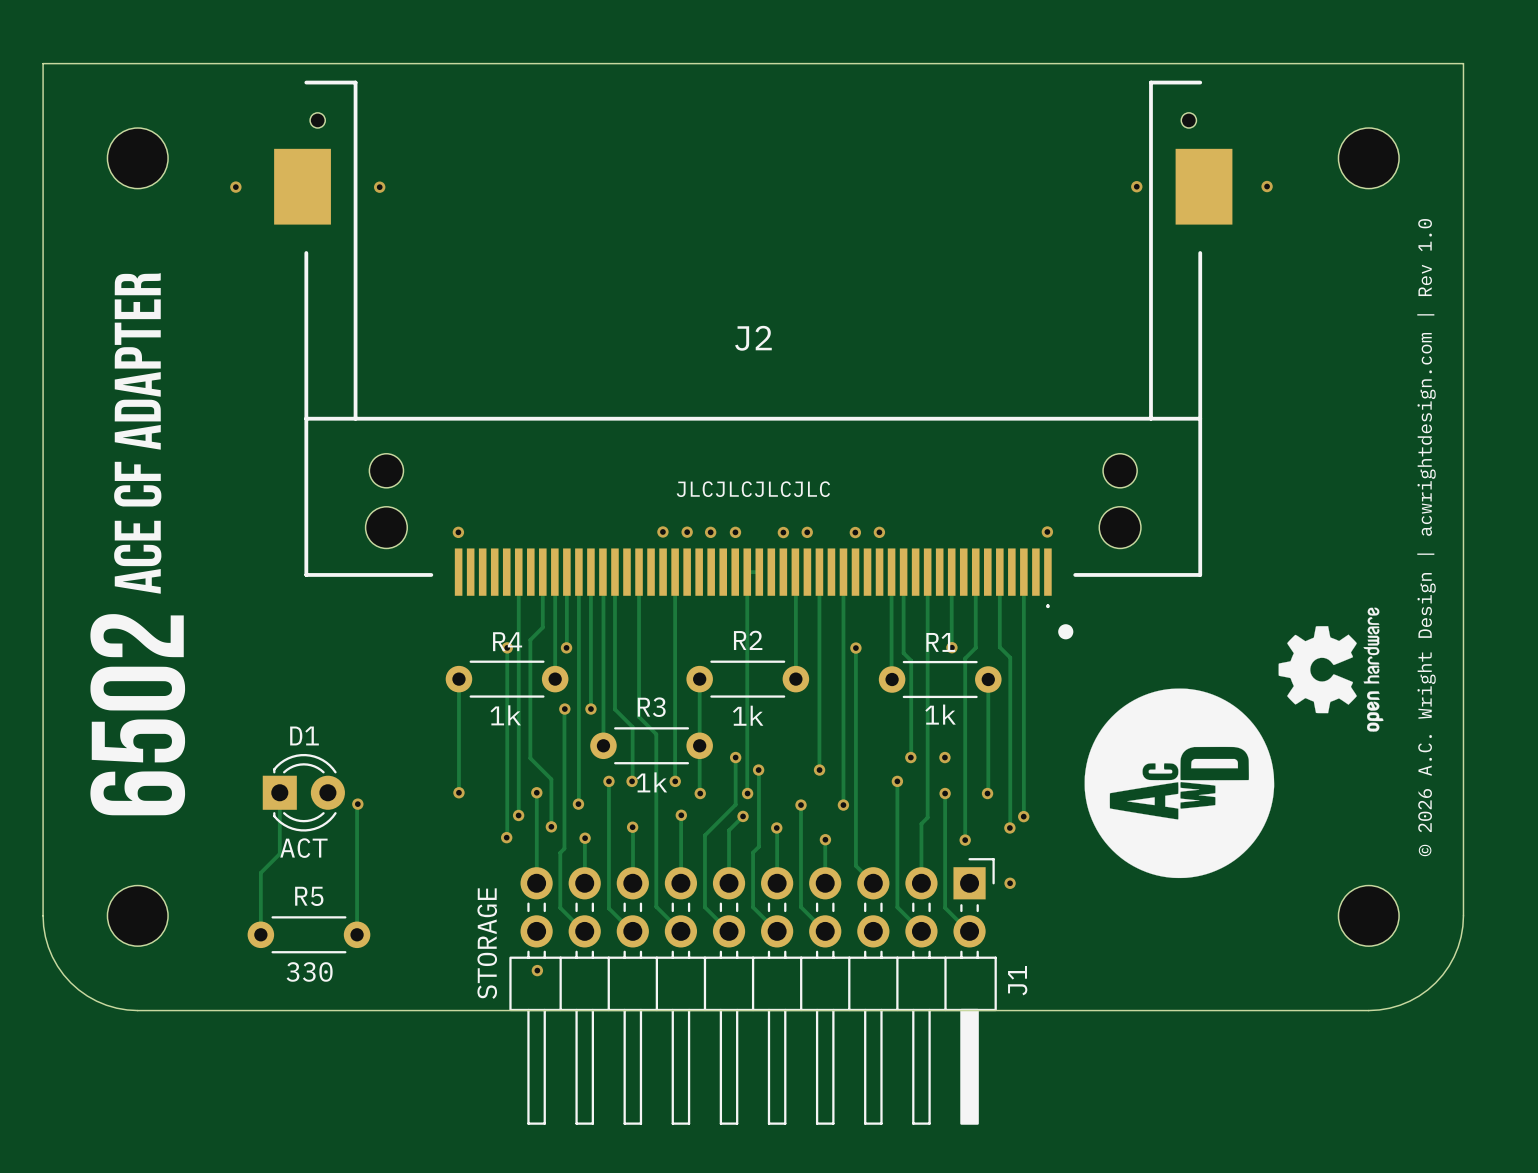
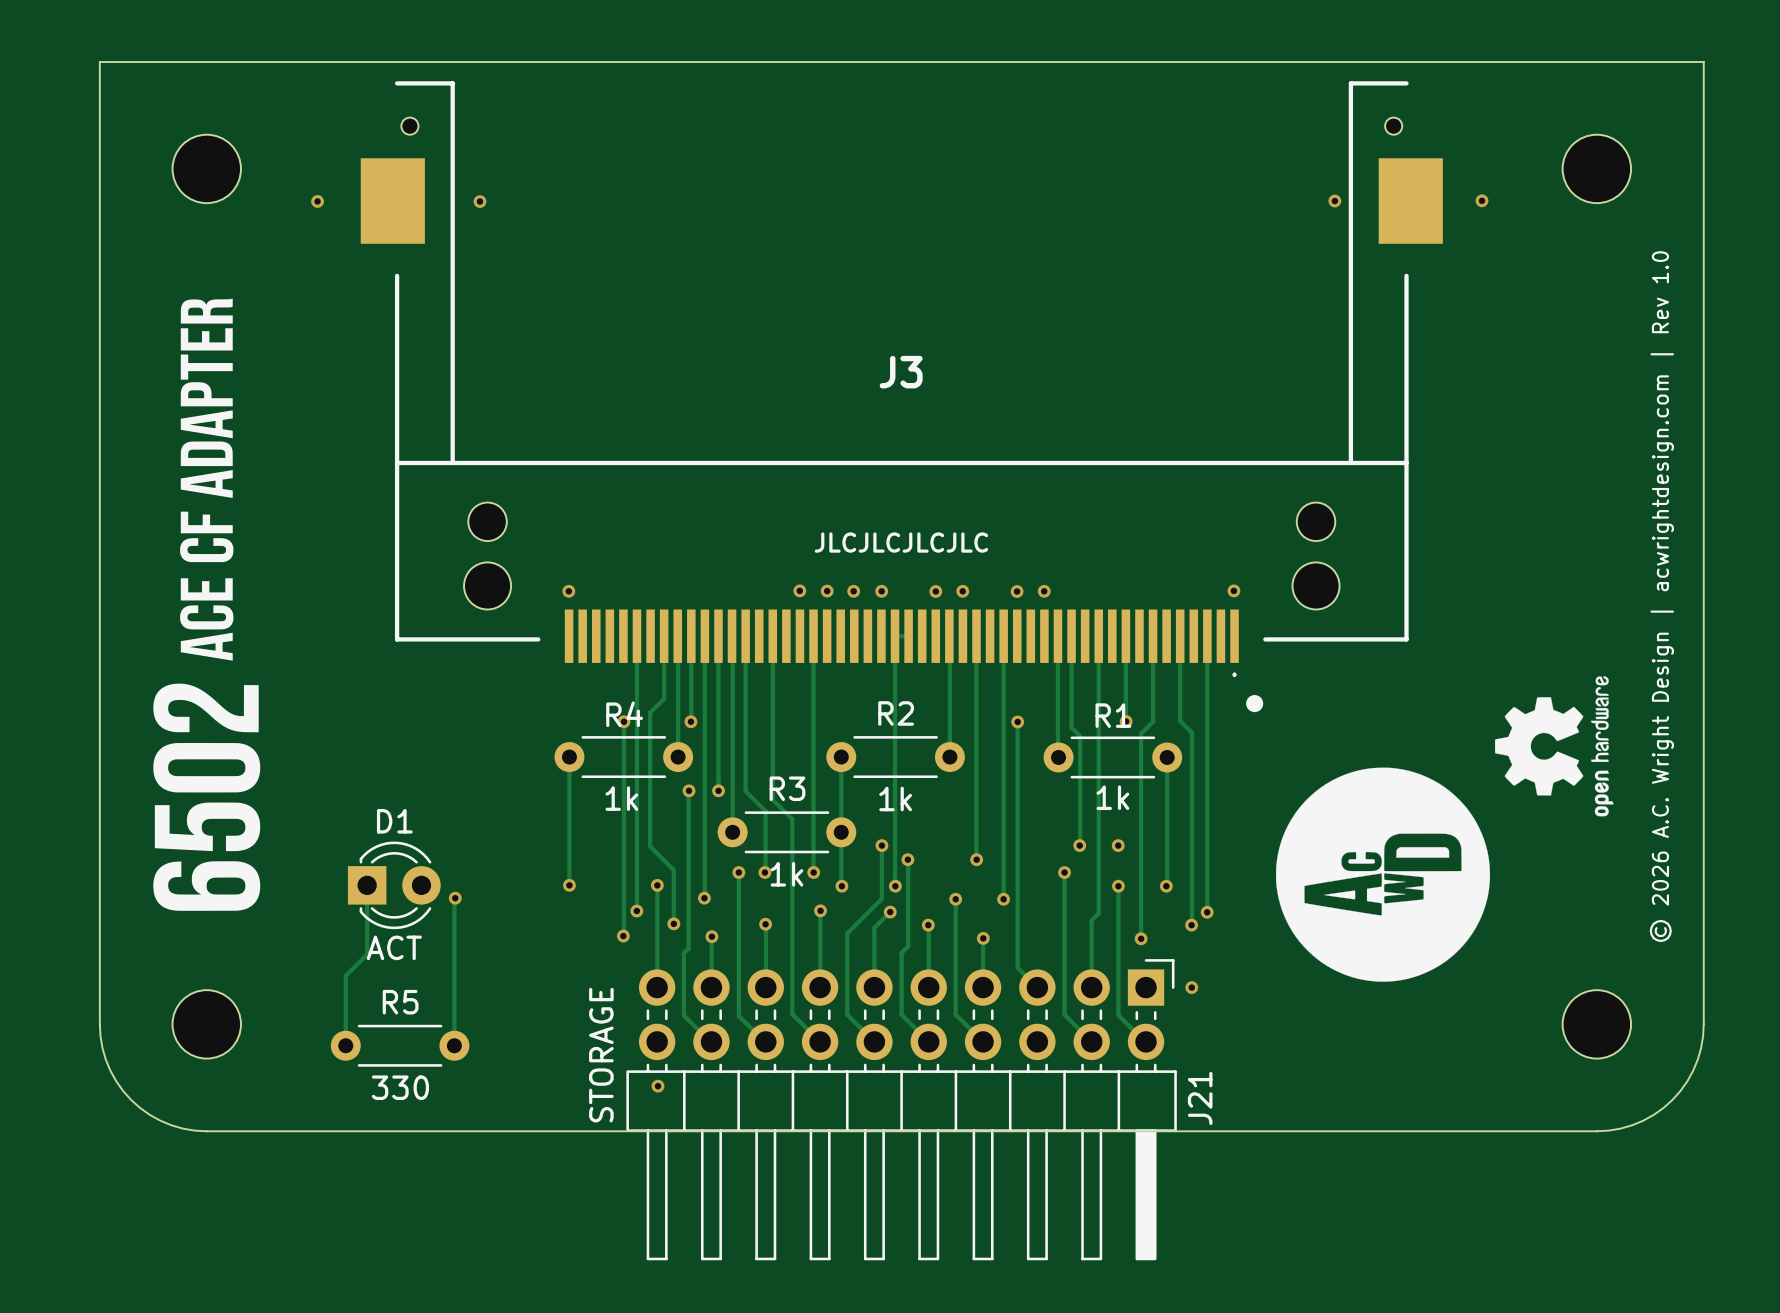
J2 name: J2 (753, 338) -> J3 (901, 372)
J1 name: J1 (1017, 980) -> J21 (1200, 1098)

